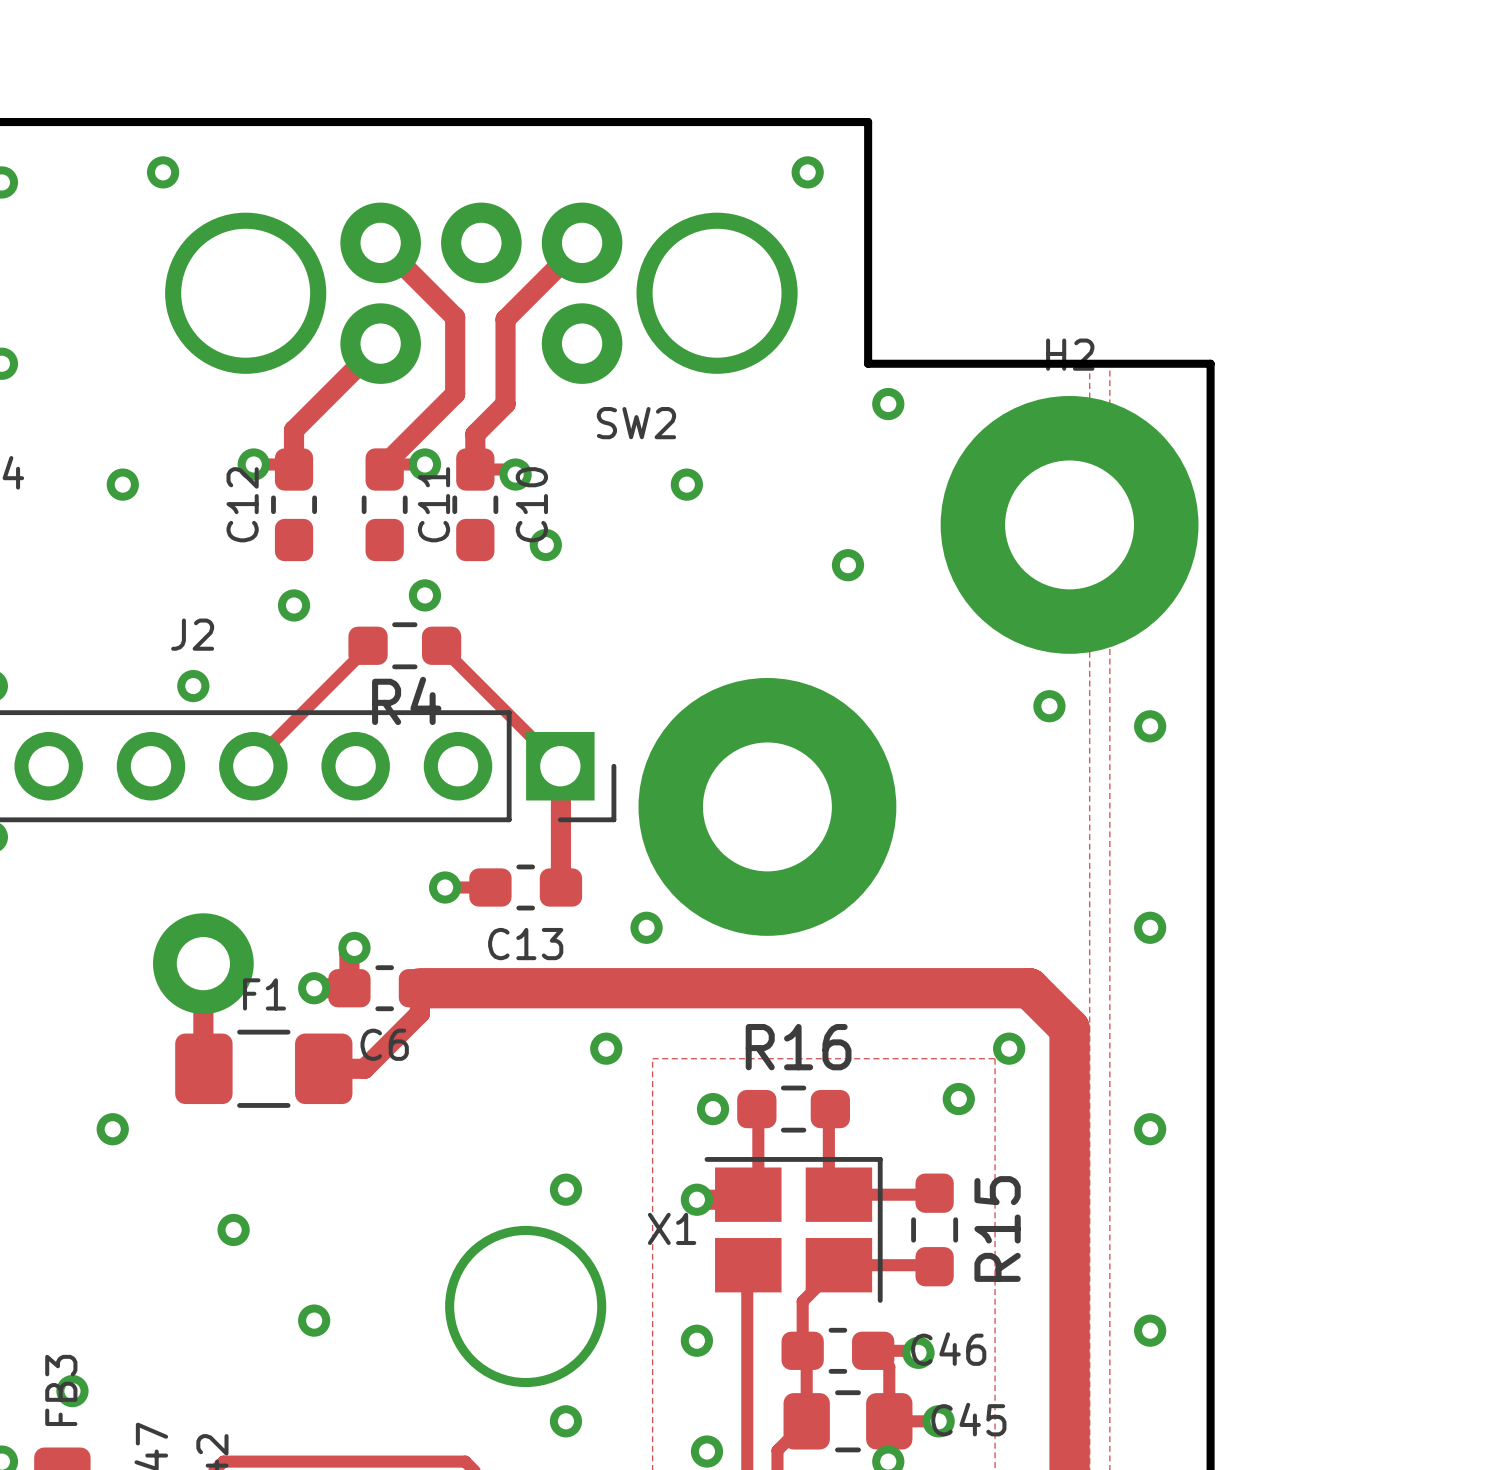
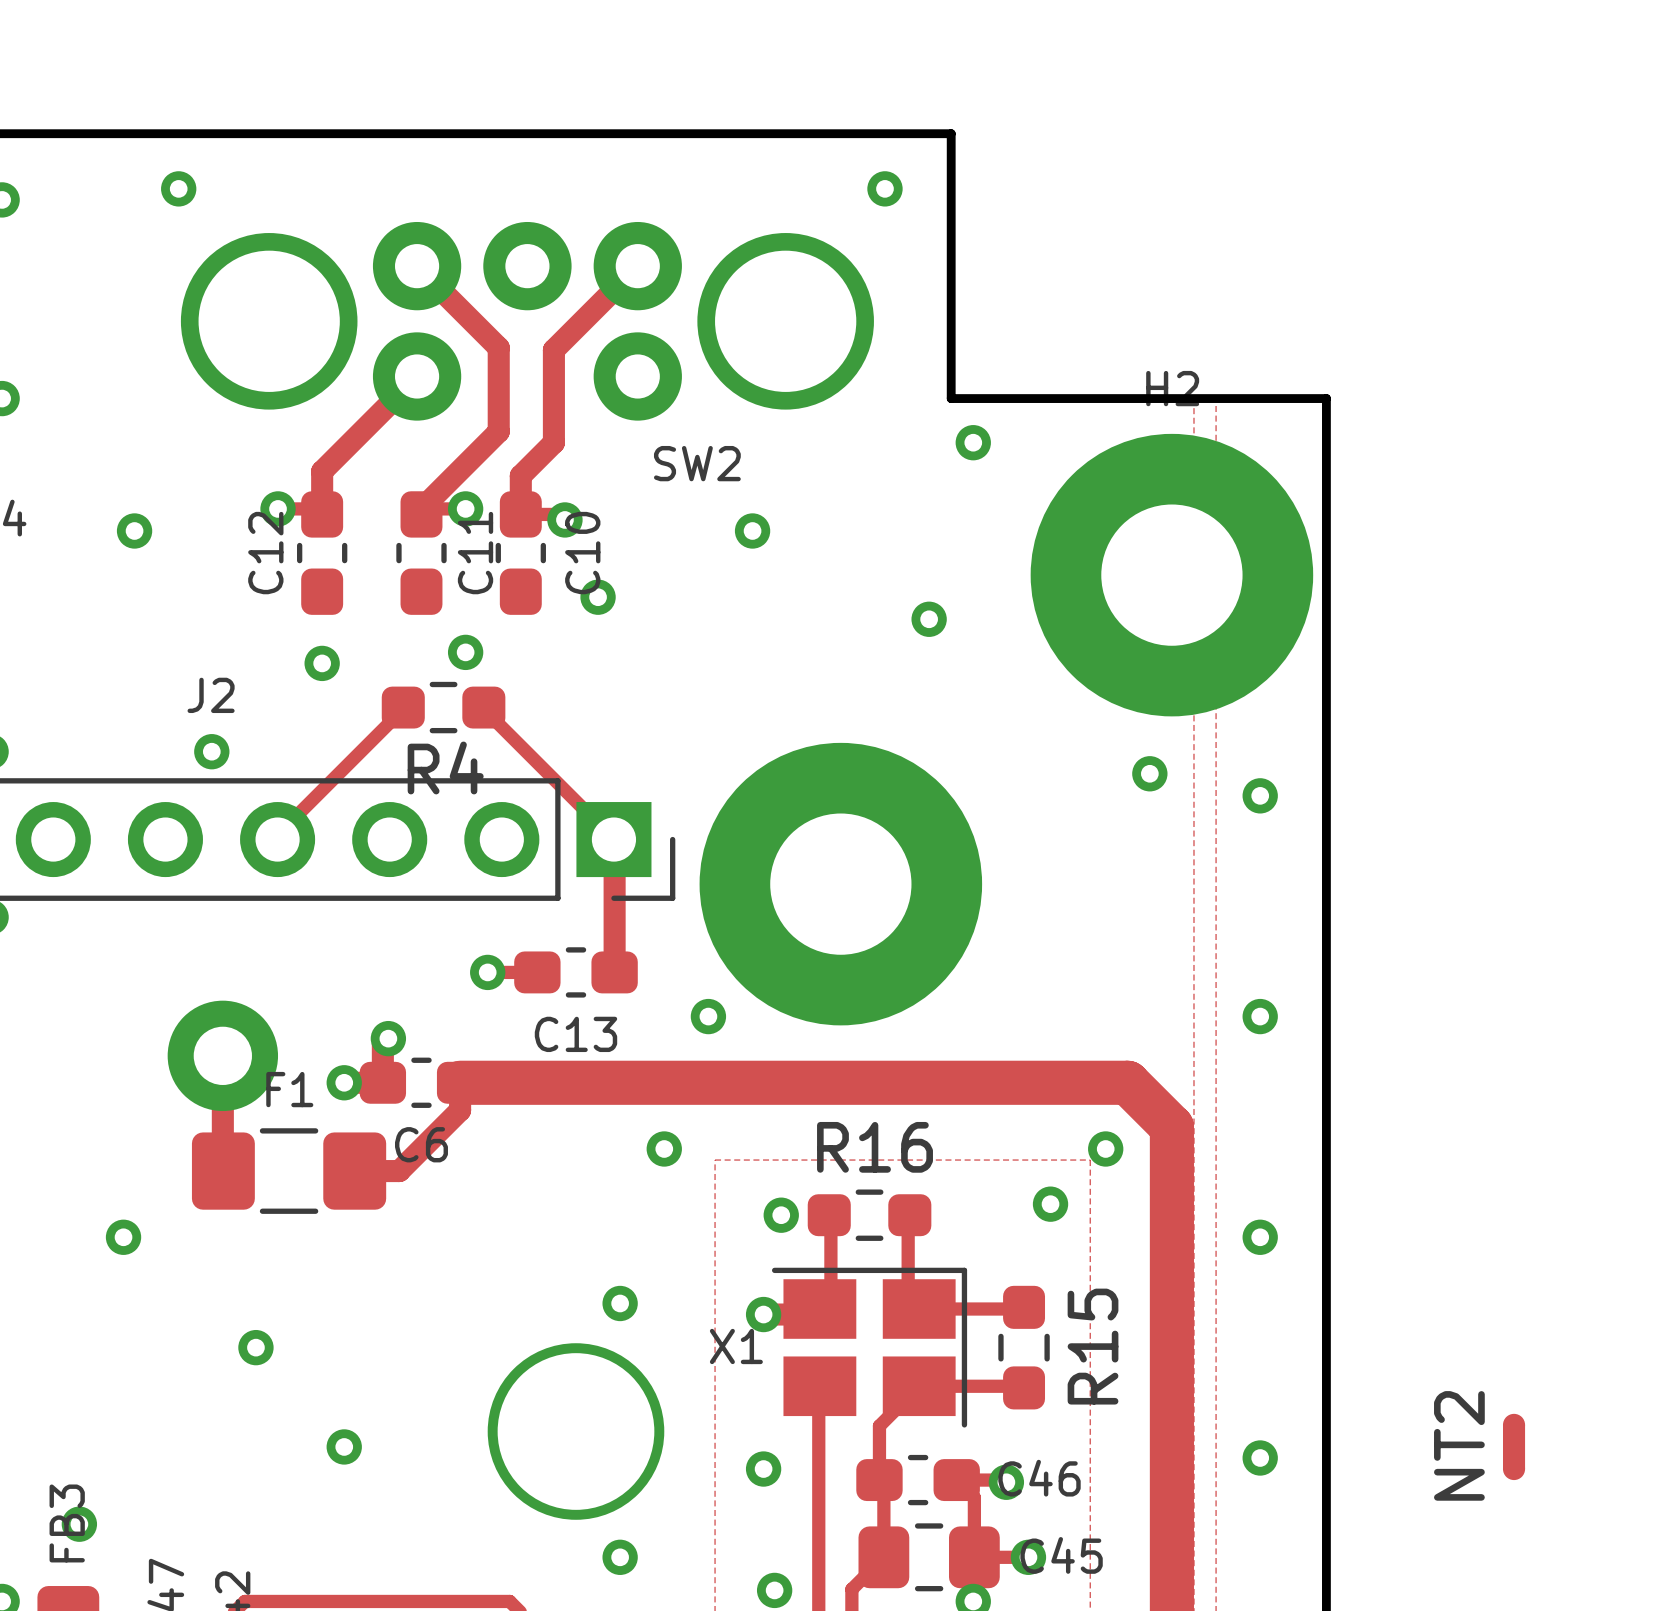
NT2: none -> (1514, 1446)

